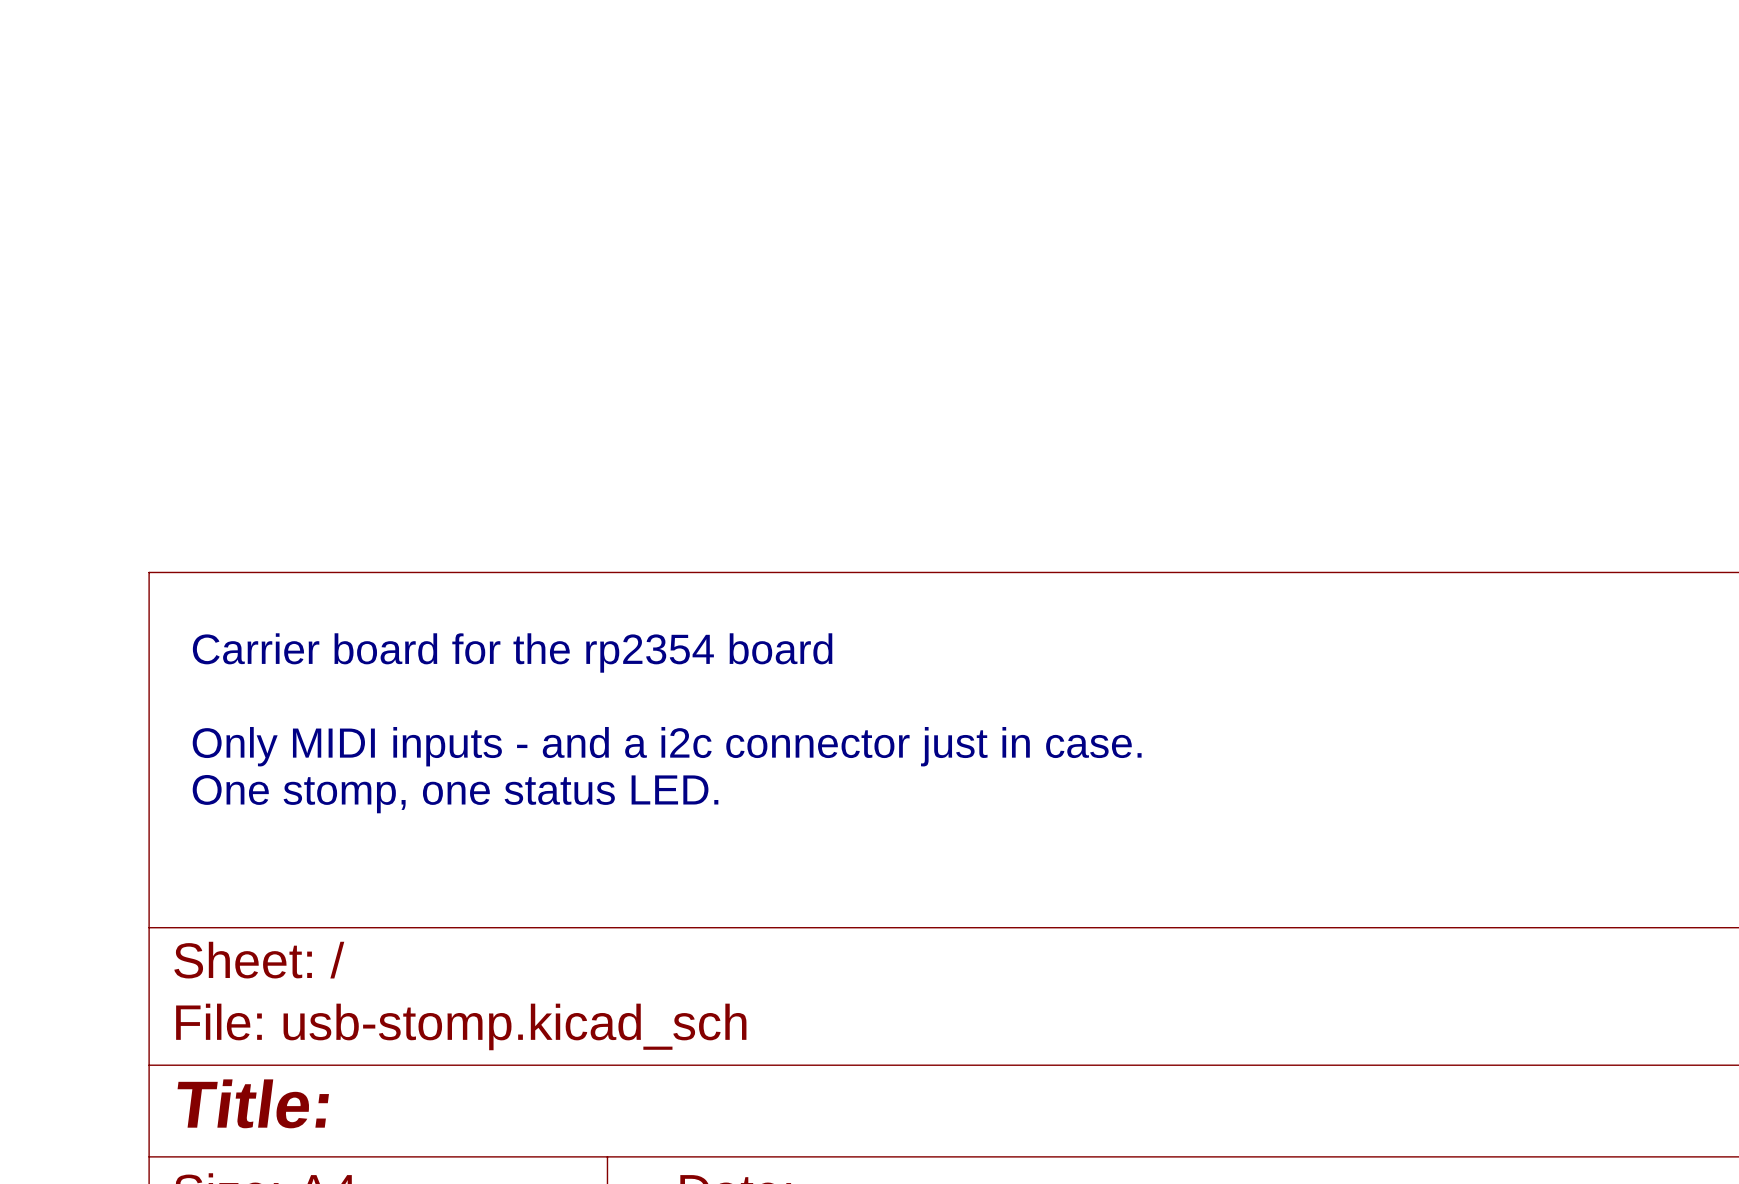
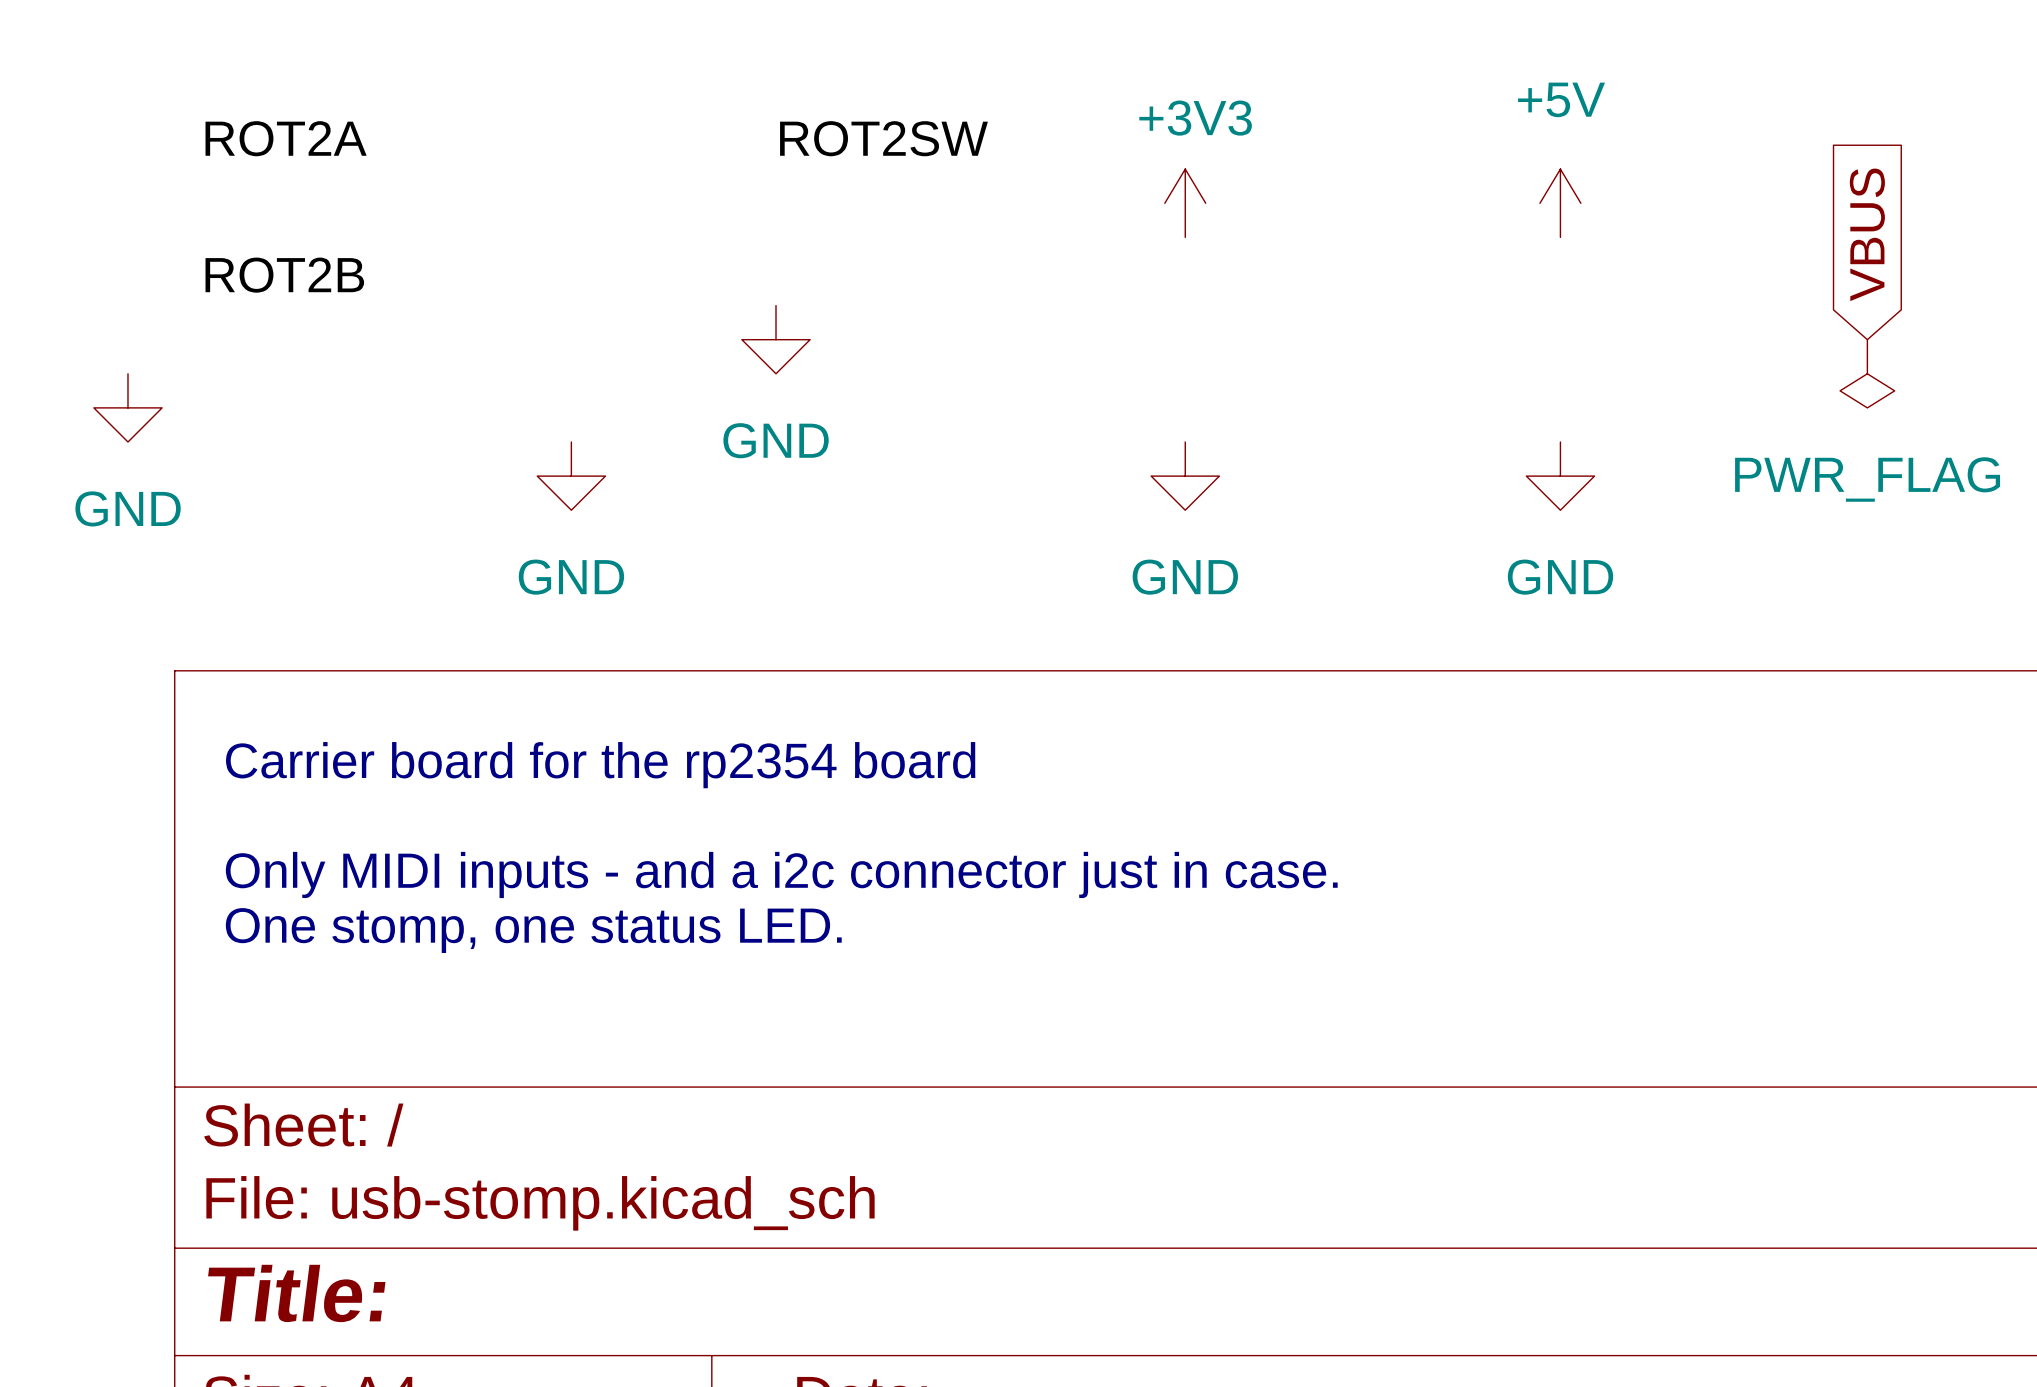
label: none -> ROT2A (286, 138)
label: none -> ROT2SW (883, 138)
power symbol: none -> +3V3 (1185, 203)
power symbol: none -> +5V (1560, 203)
global label: none -> VBUS (1867, 234)
label: none -> ROT2B (284, 275)
power symbol: none -> GND (776, 339)
power symbol: none -> PWR_FLAG (1867, 373)
power symbol: none -> GND (127, 407)
power symbol: none -> GND (571, 476)
power symbol: none -> GND (1185, 476)
power symbol: none -> GND (1560, 476)

